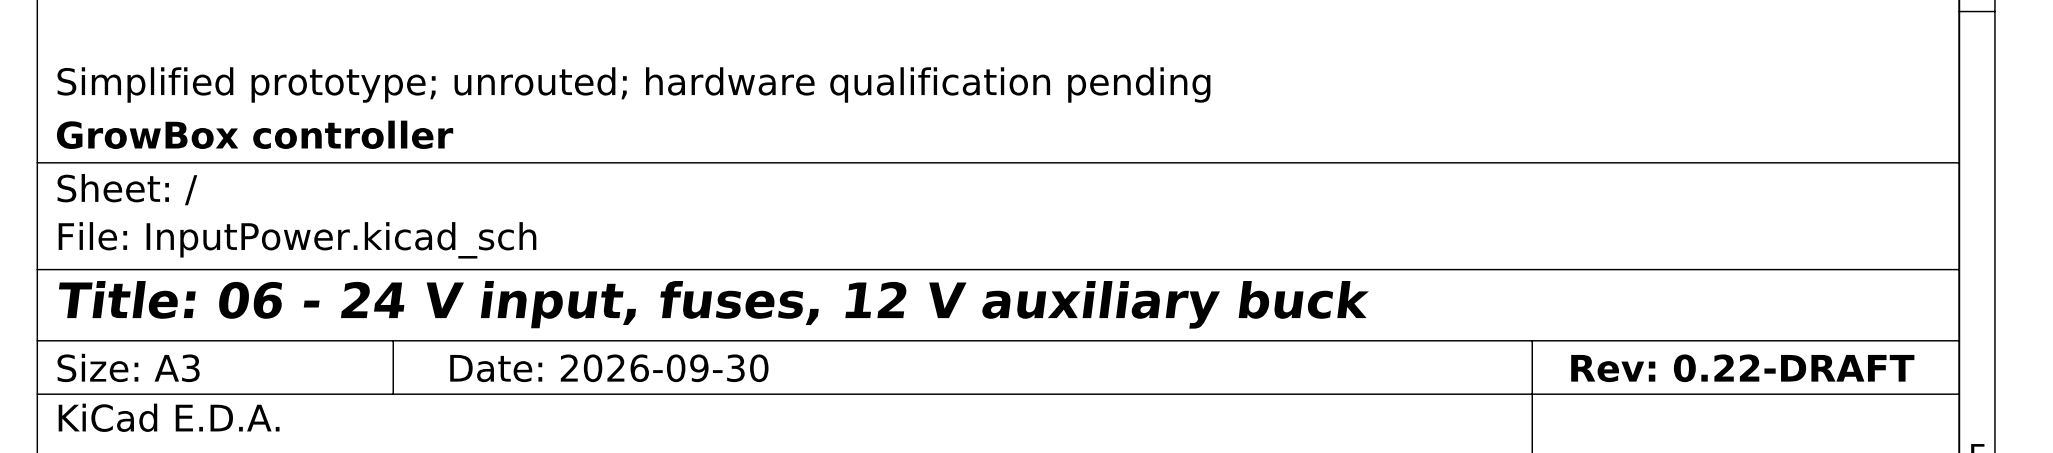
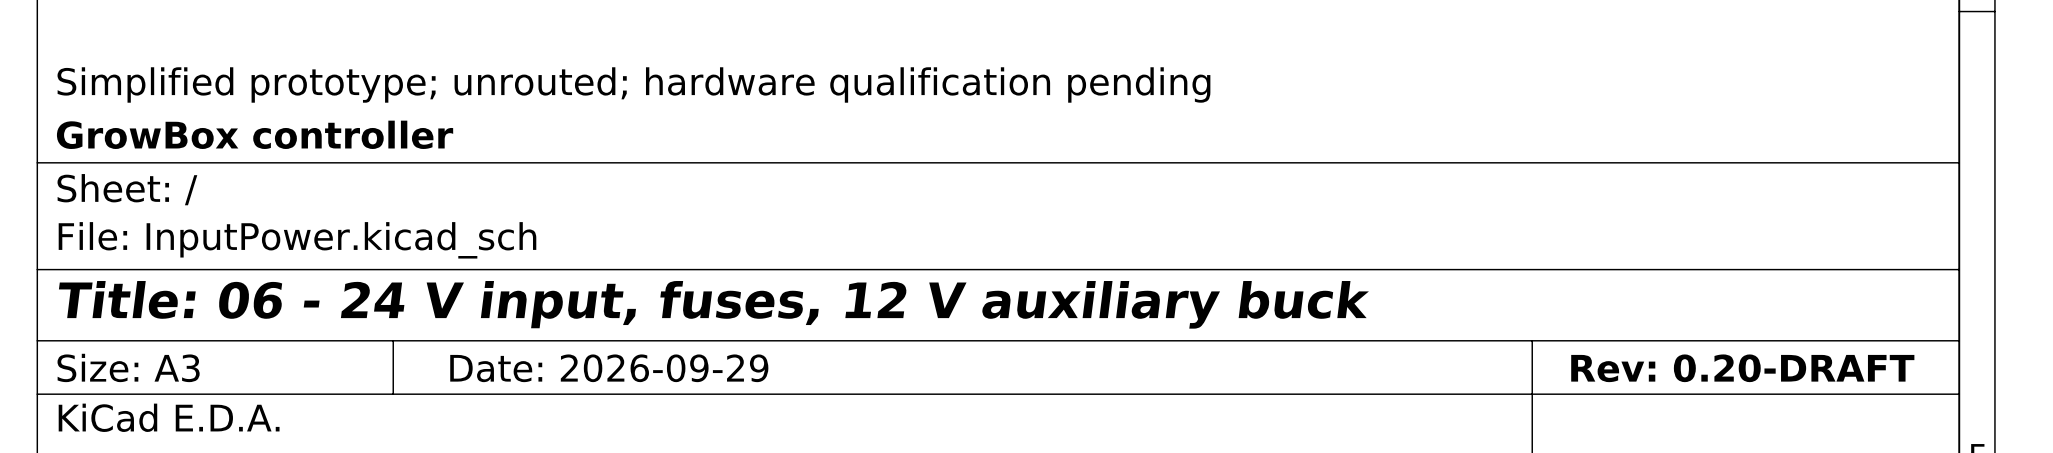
title block: Date: 2026-09-30 (609, 368) -> Date: 2026-09-29 (609, 368)
title block: Rev: 0.22-DRAFT (1742, 368) -> Rev: 0.20-DRAFT (1742, 368)

